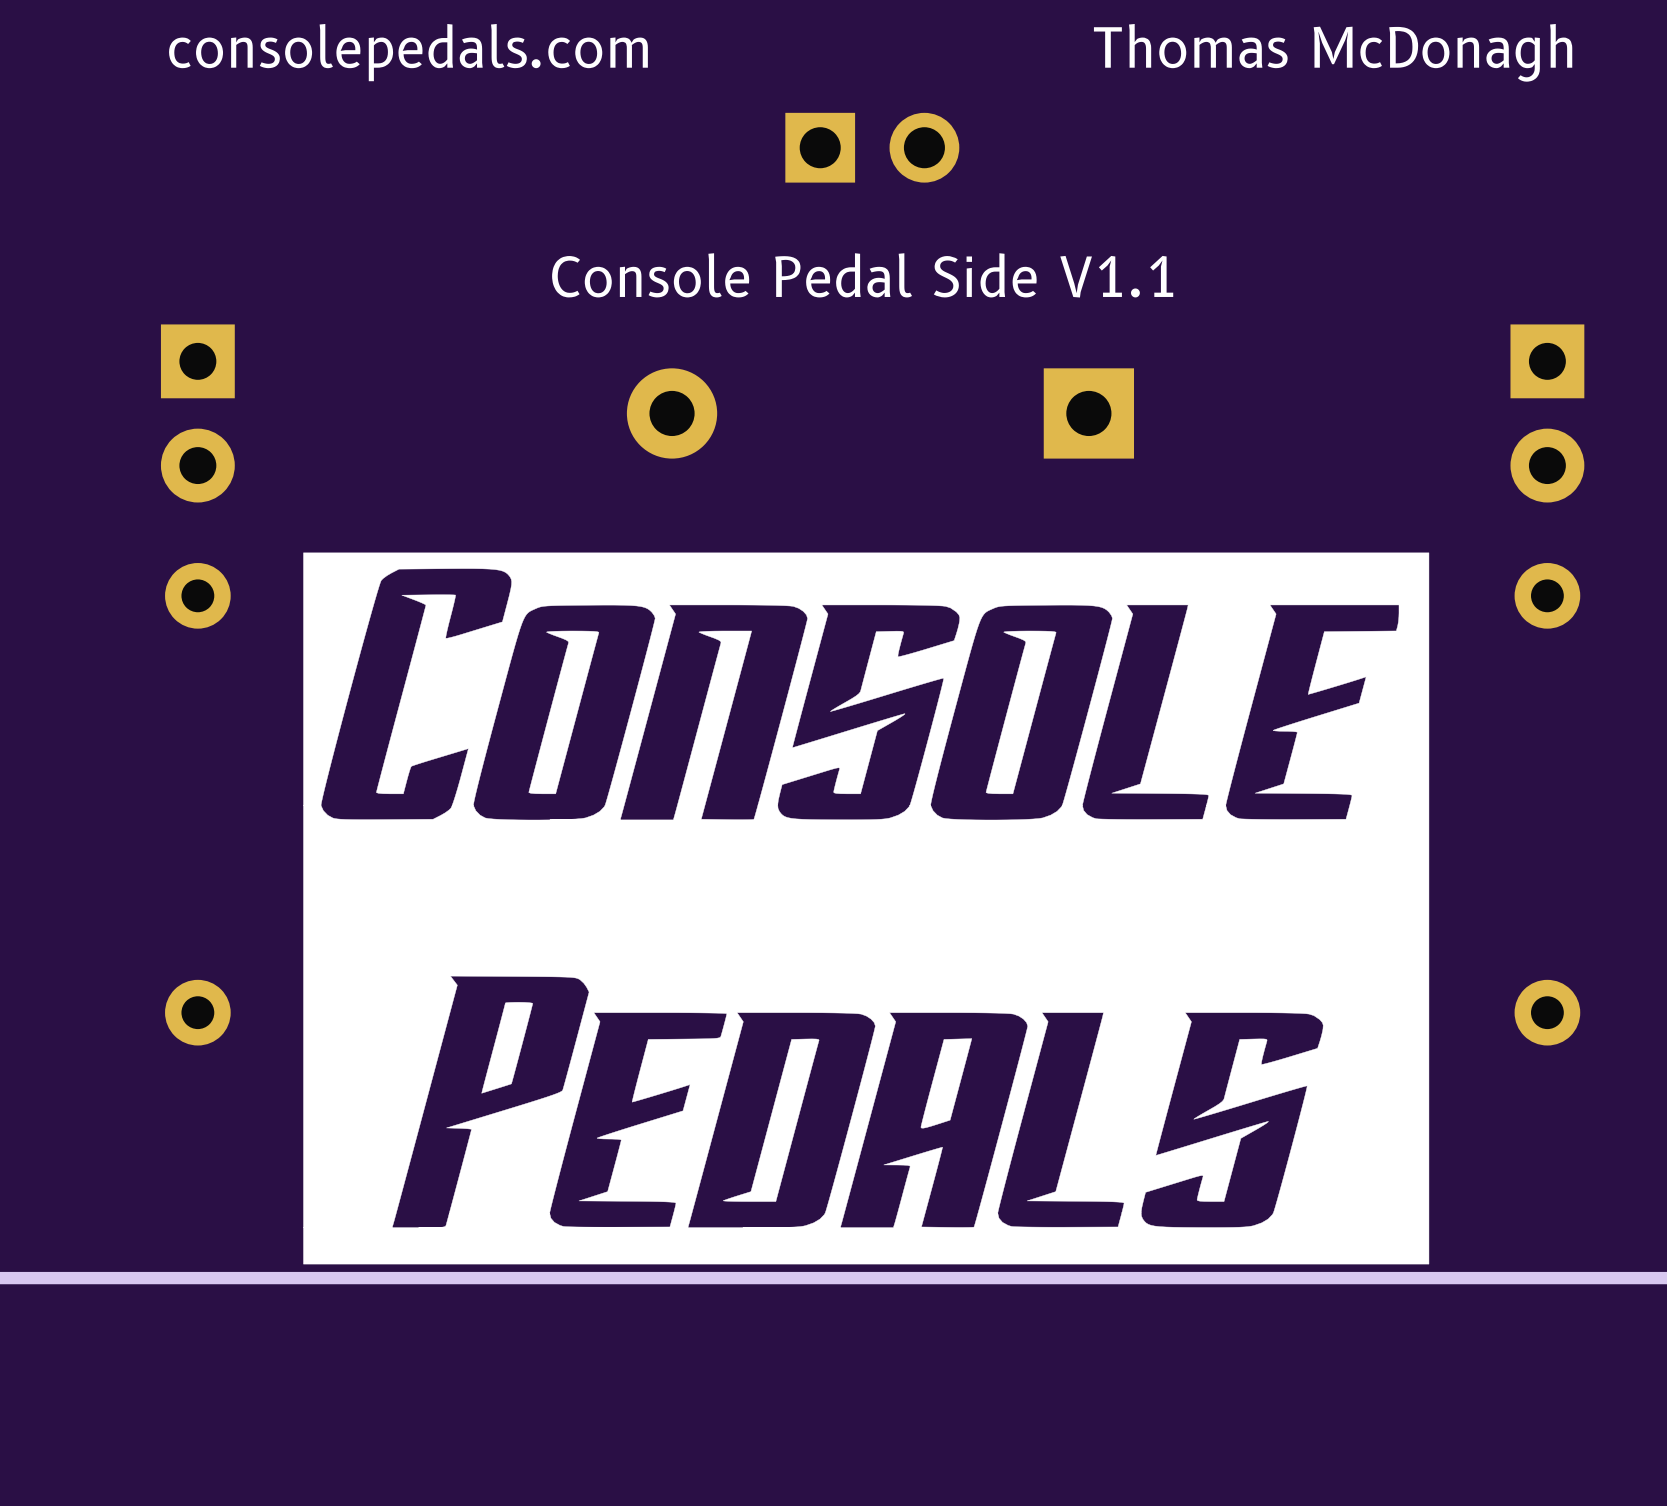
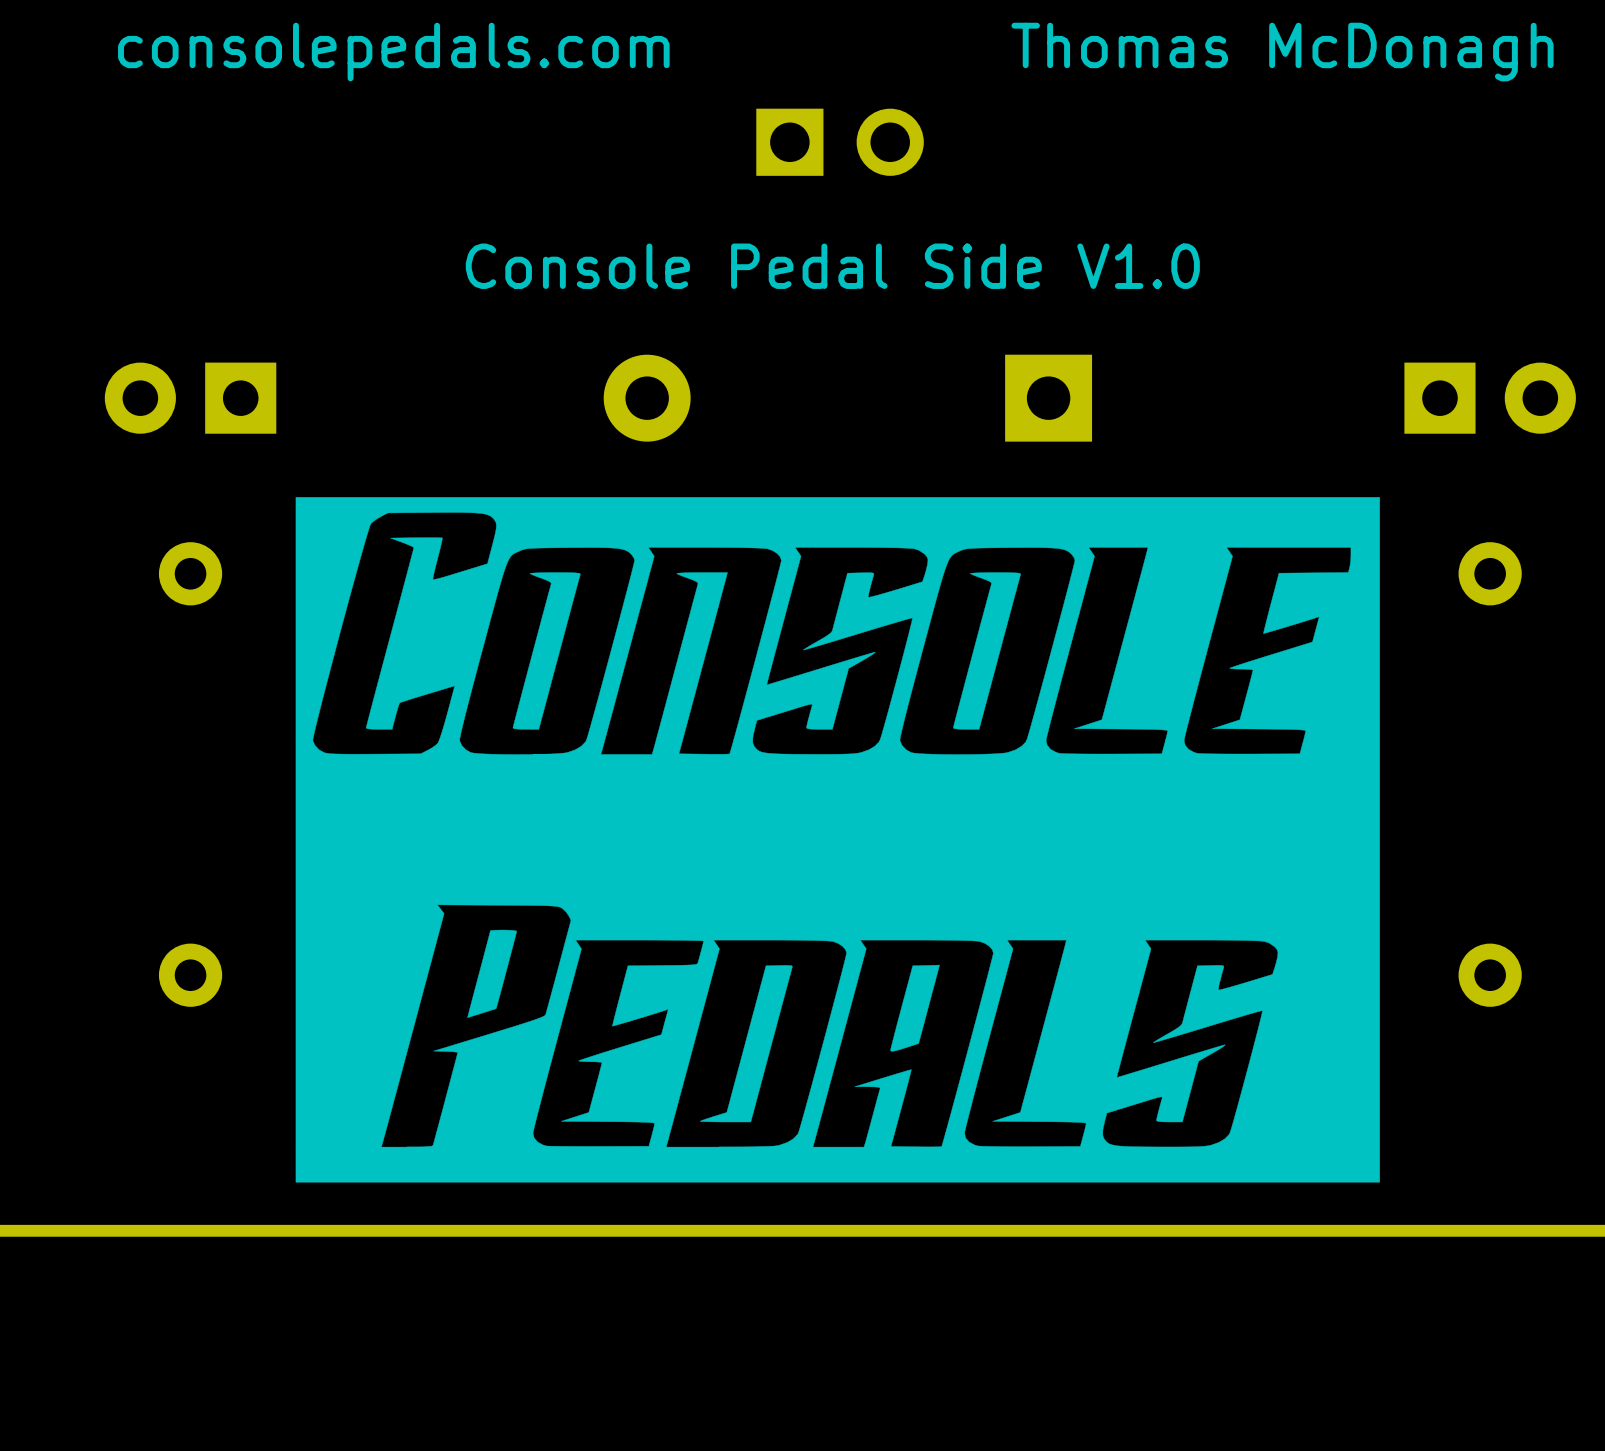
text: Console Pedal Side V1.1 (862, 275) -> Console Pedal Side V1.0 (832, 266)
part rotation: 0° (197, 413) -> 90° clockwise (190, 398)
part rotation: 0° (1547, 413) -> 90° counterclockwise (1490, 398)
drawing position: (866, 908) -> (837, 839)

